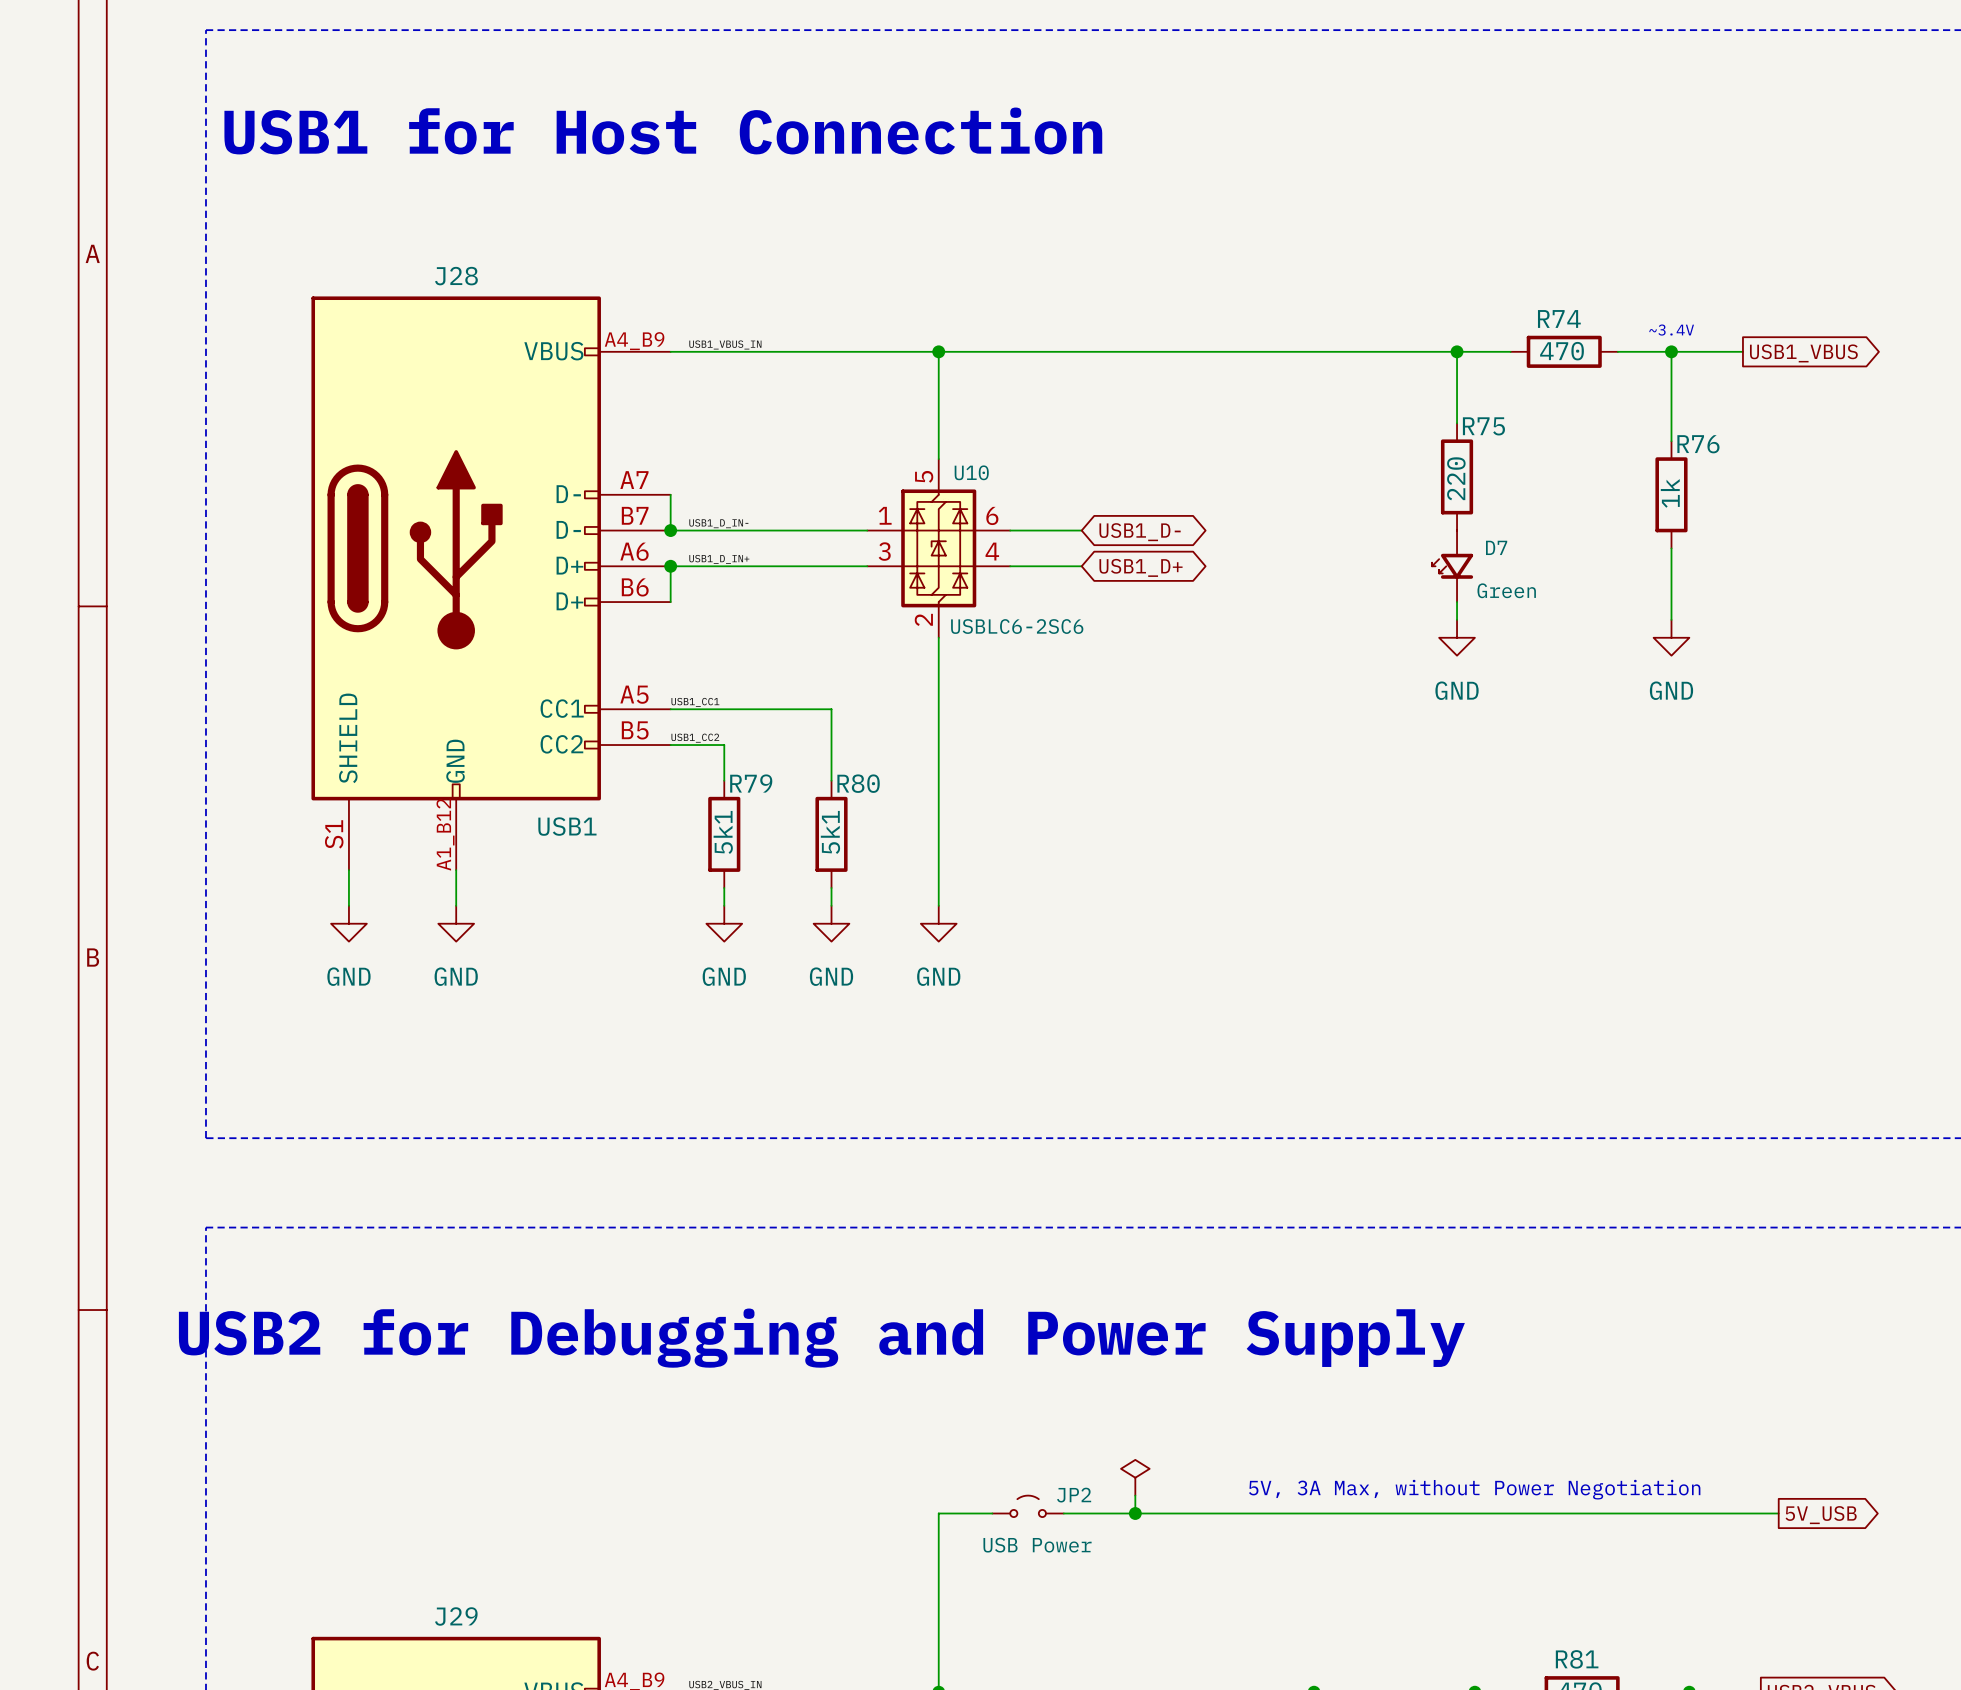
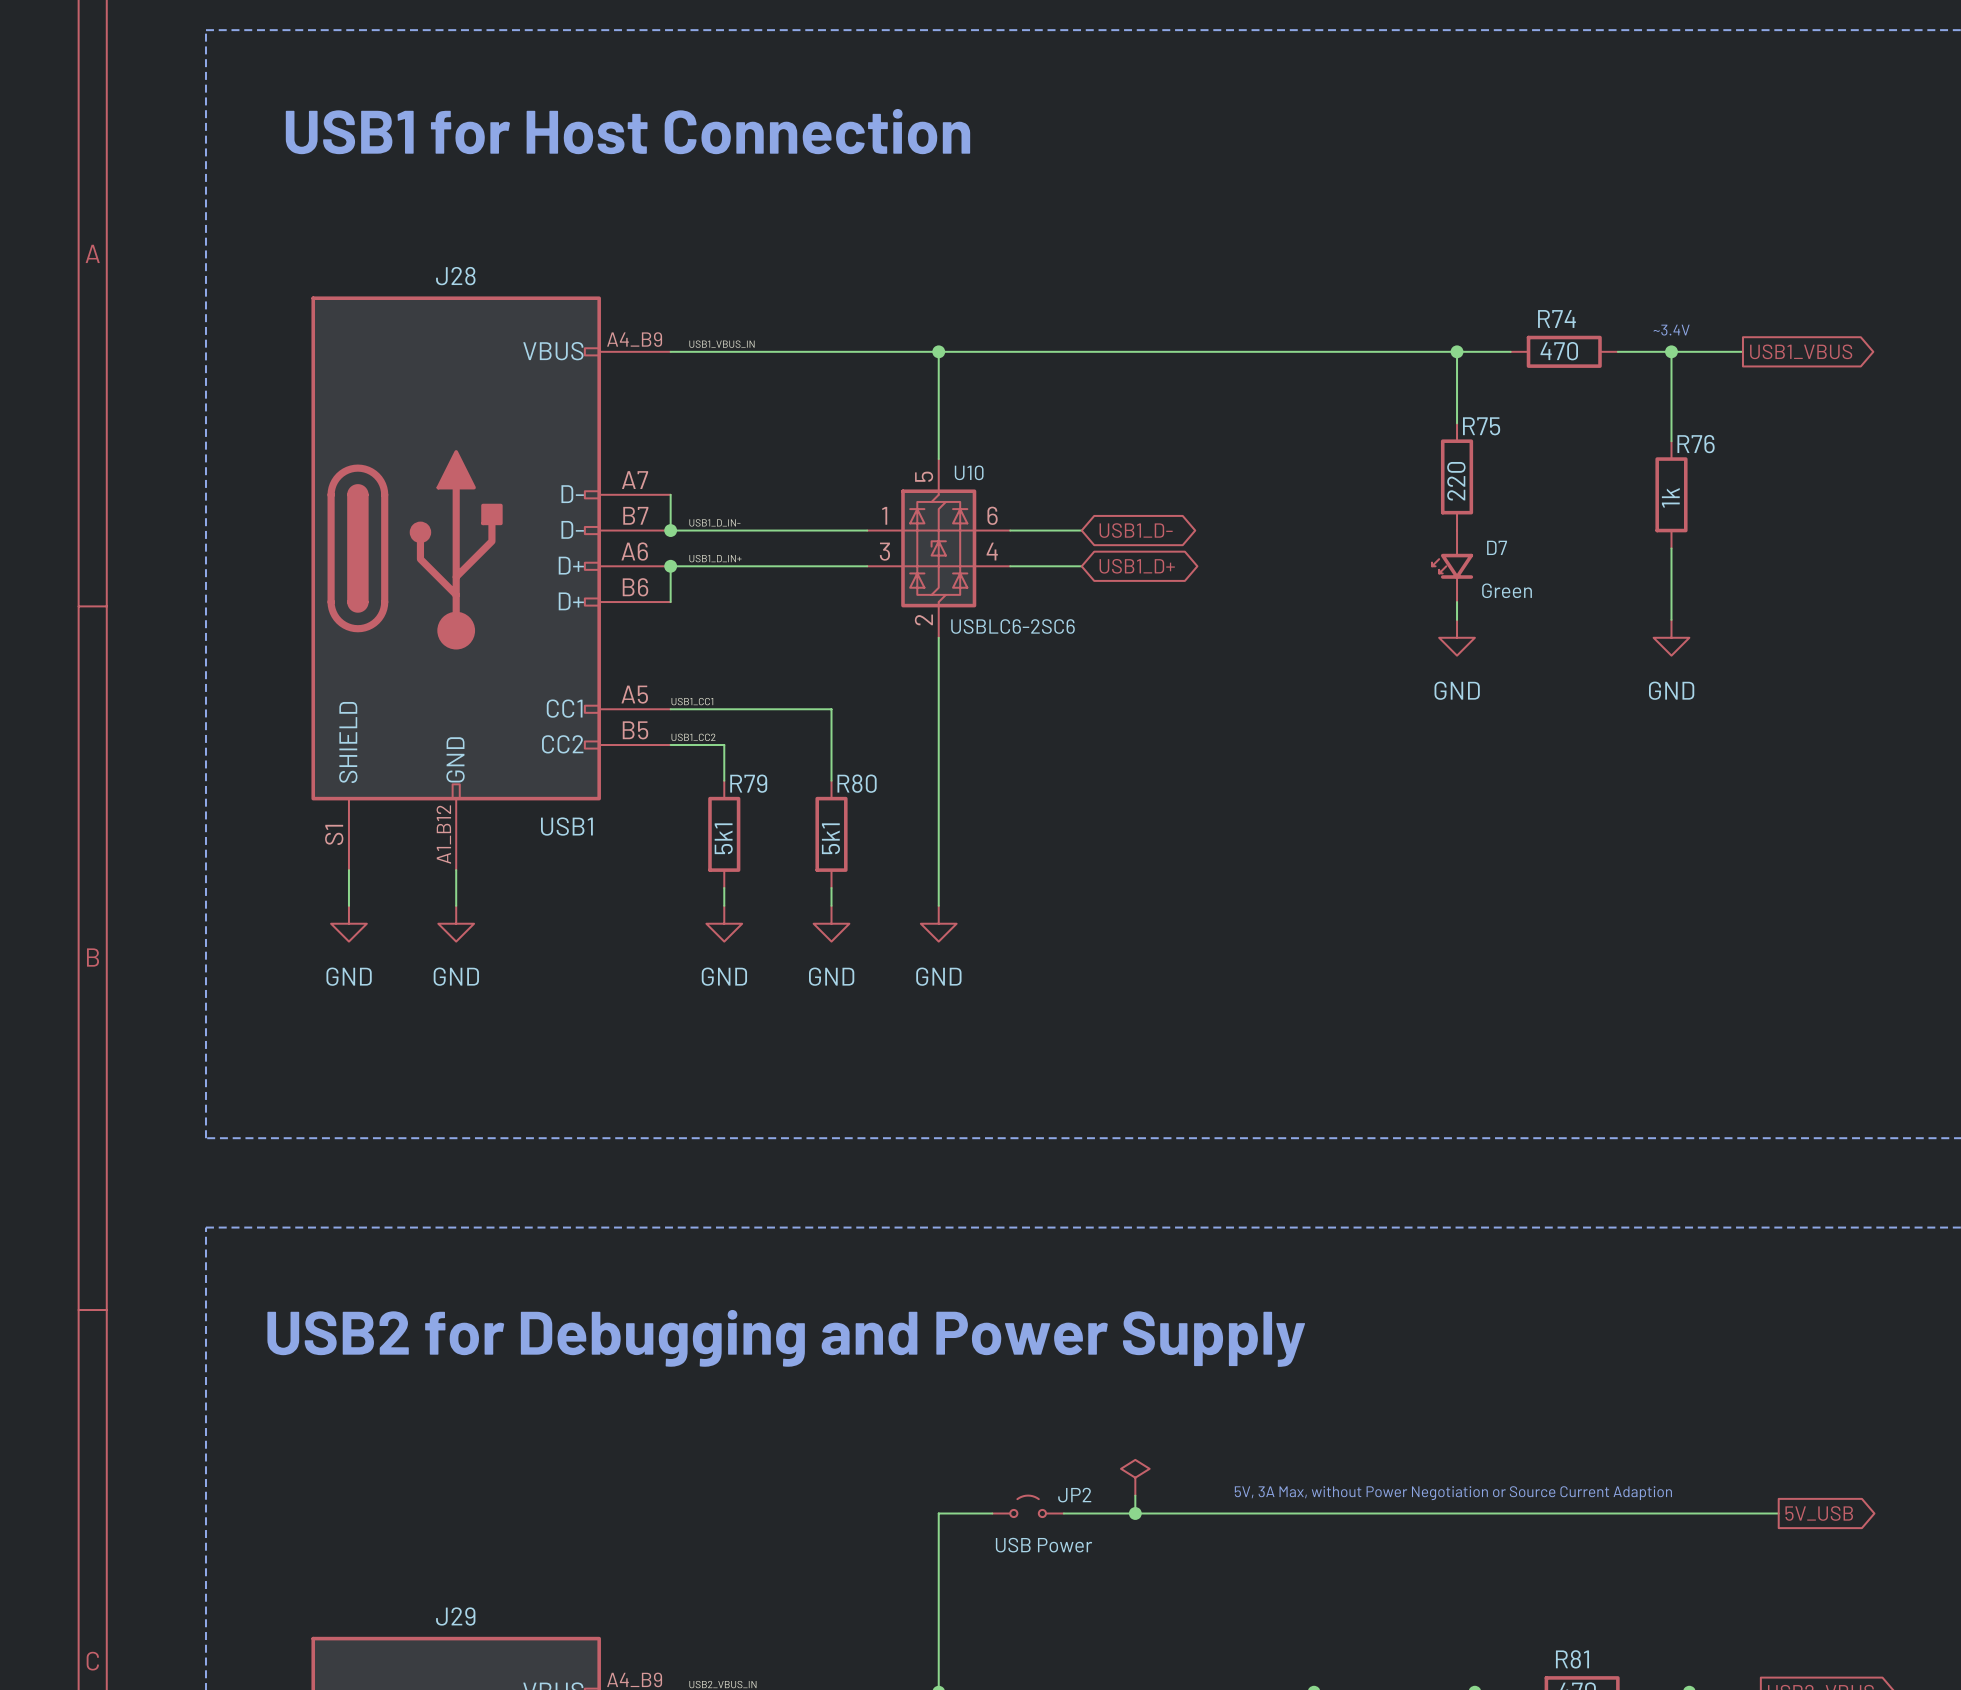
text position: USB1 for Host Connection (663, 130) -> USB1 for Host Connection (627, 131)
text position: USB2 for Debugging and Power Supply (821, 1338) -> USB2 for Debugging and Power Supply (786, 1338)
text: 5V, 3A Max, without Power Negotiation (1474, 1489) -> 5V, 3A Max, without Power Negotiation or Source Current Adaption (1453, 1493)

